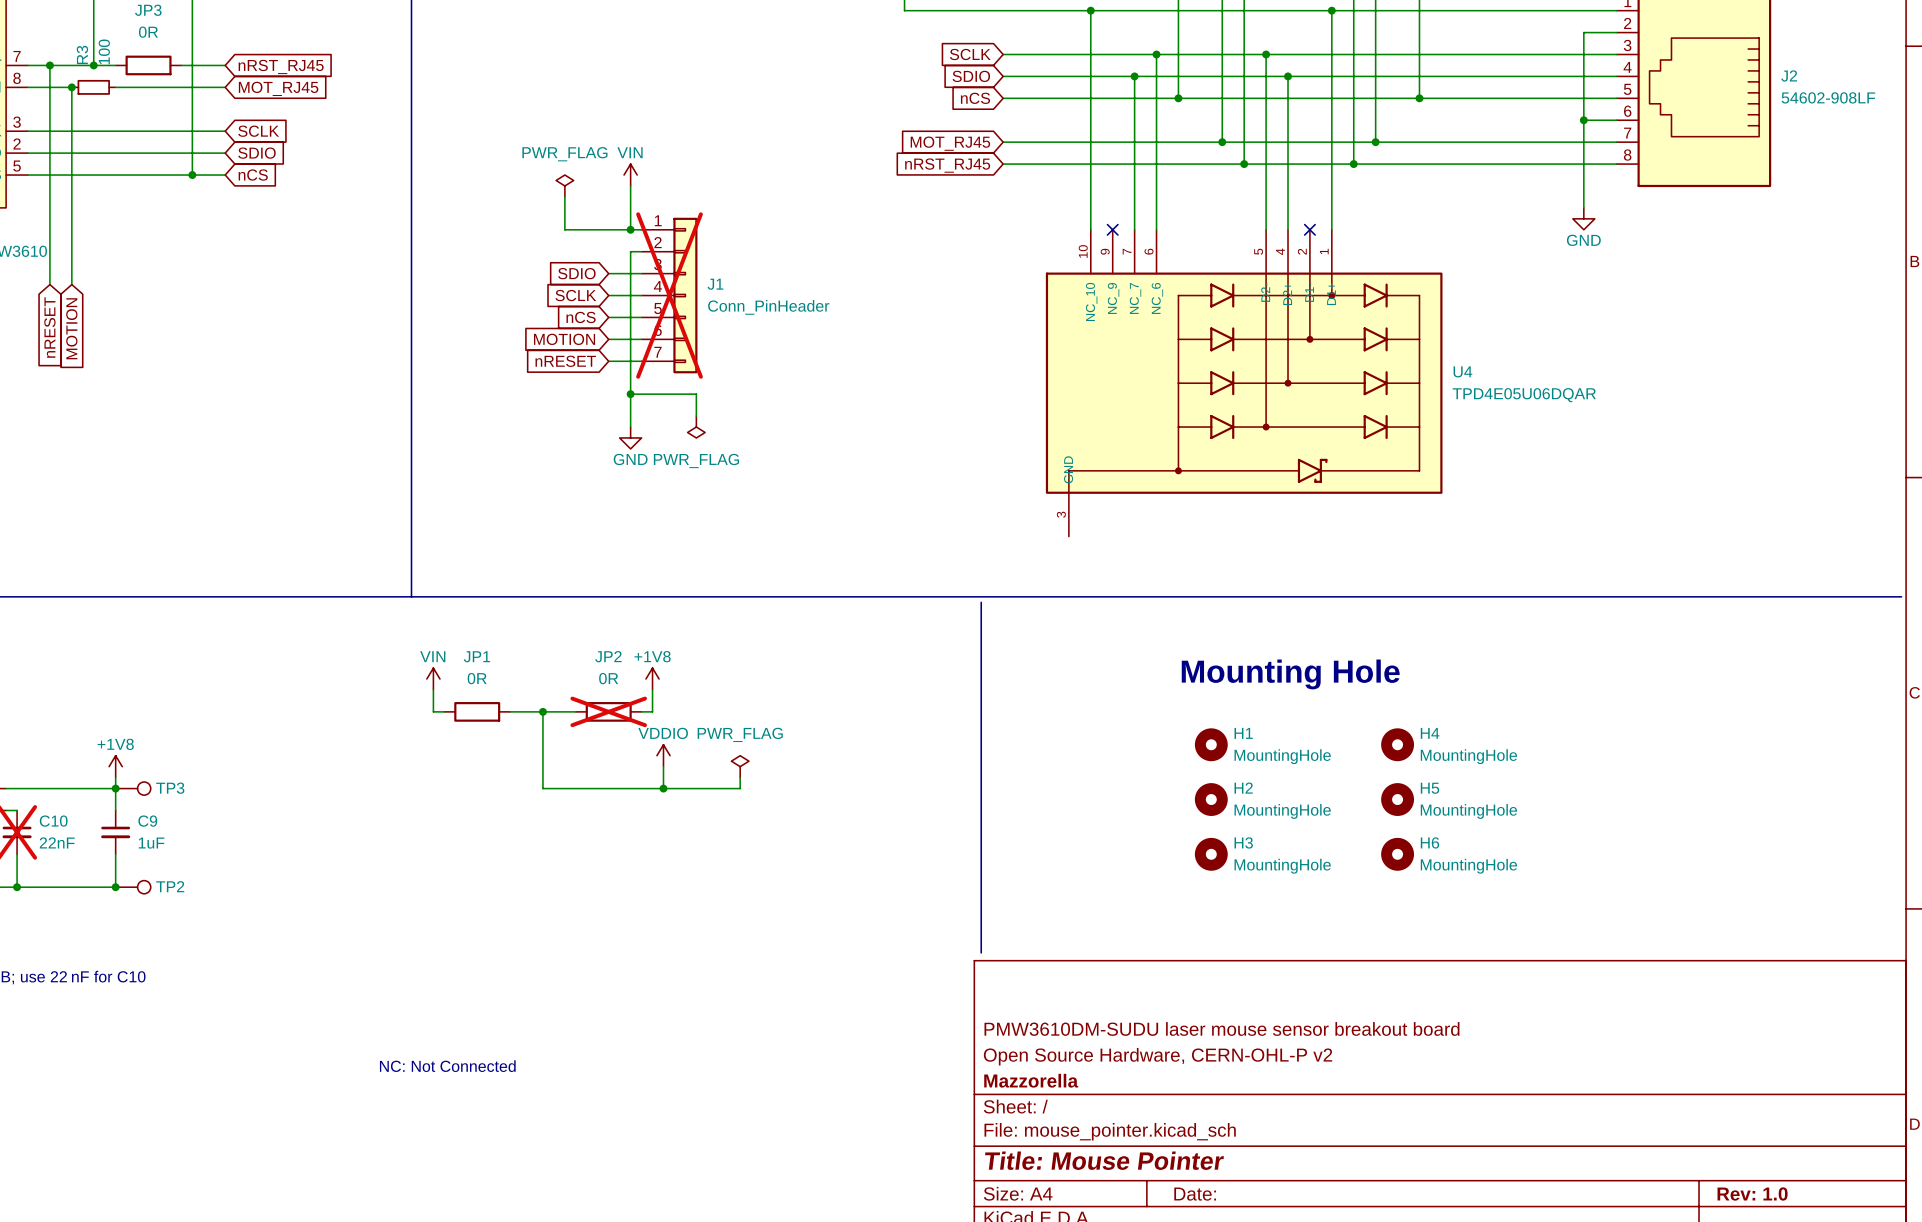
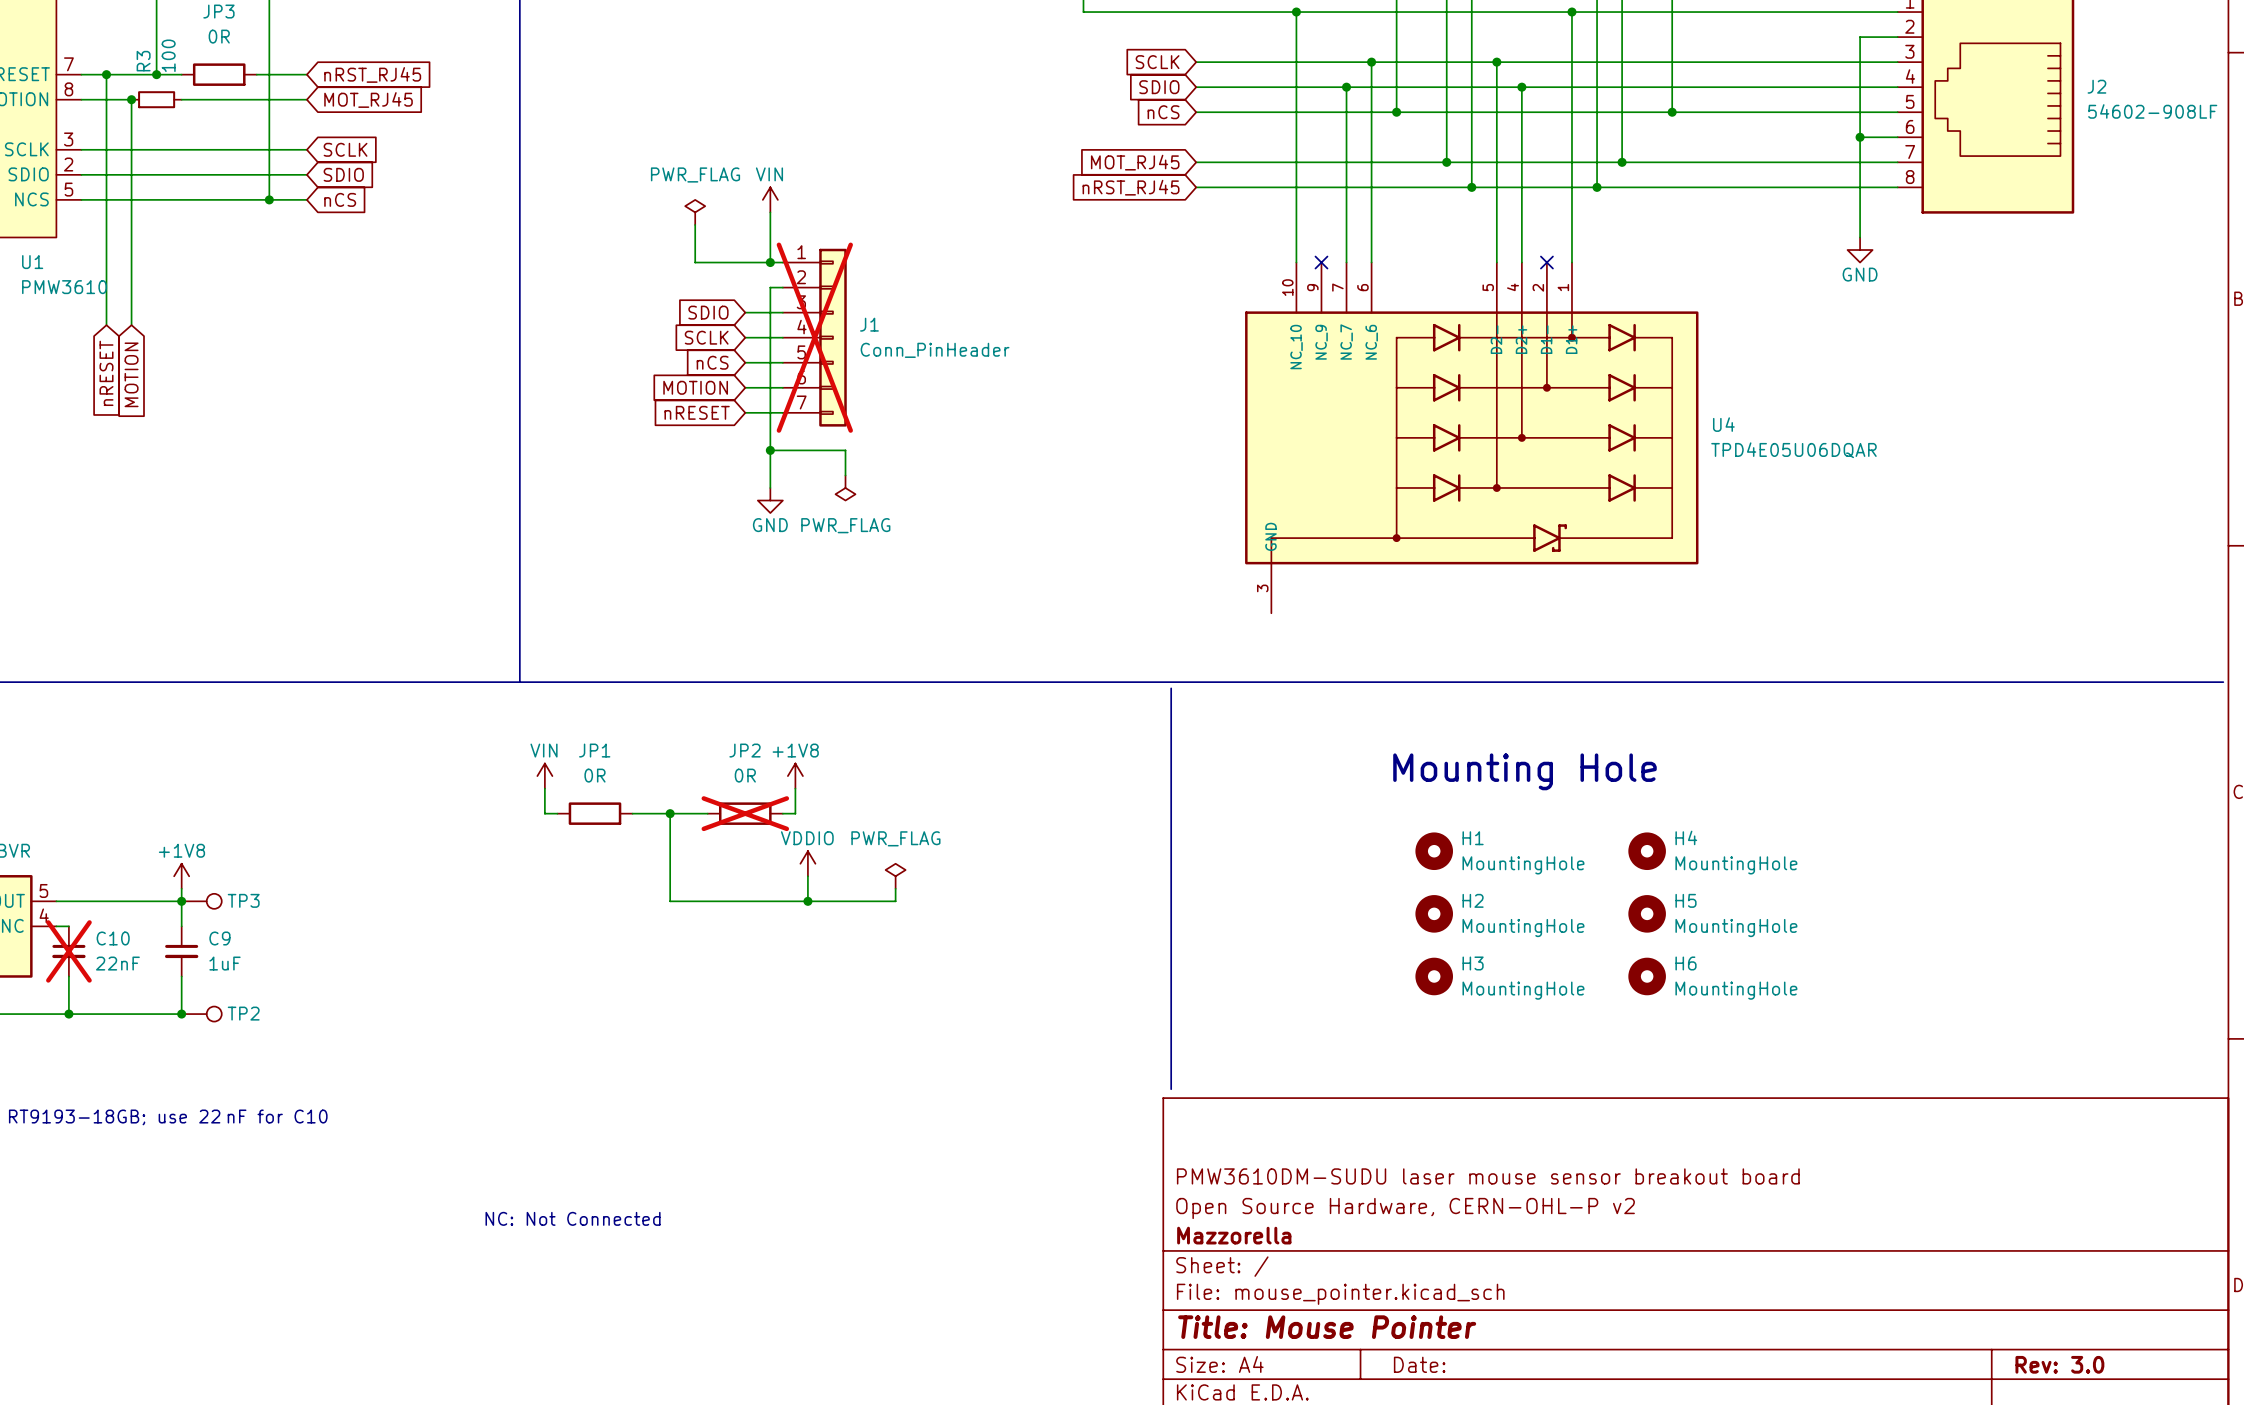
title block: Rev: 1.0 (1752, 1194) -> Rev: 3.0 (2059, 1364)

